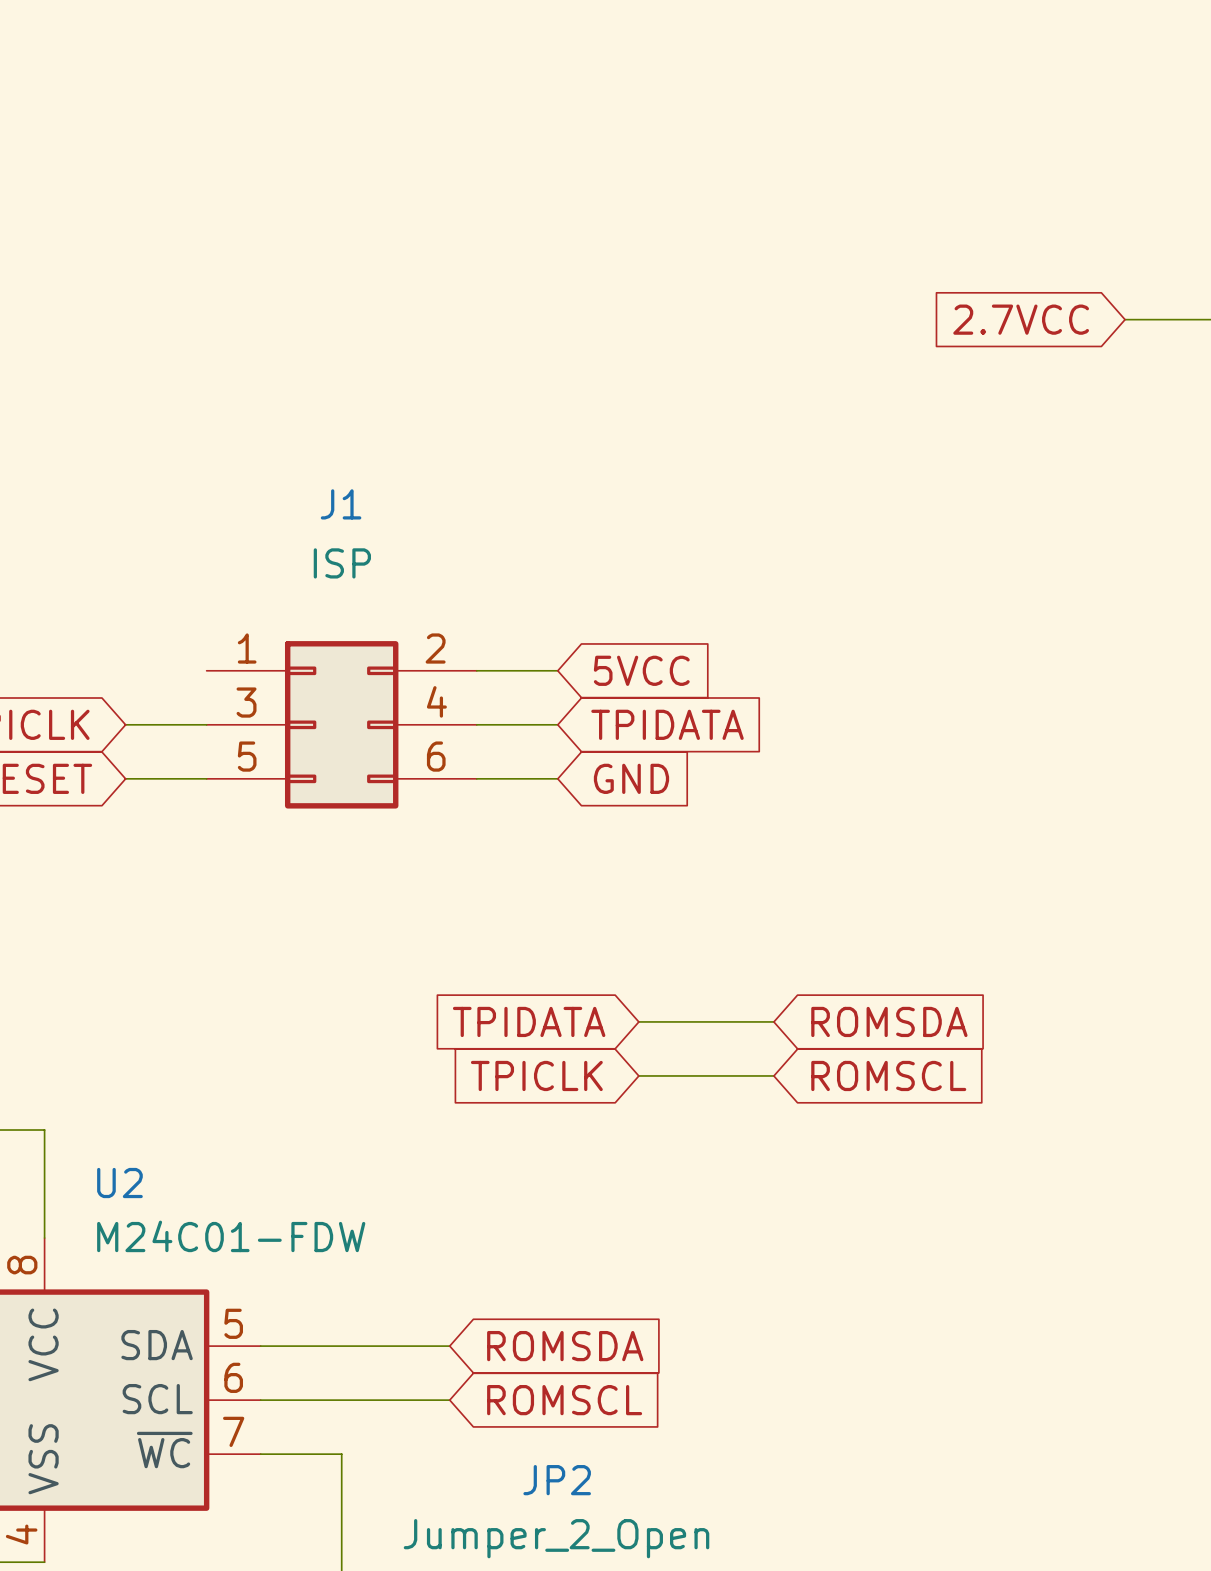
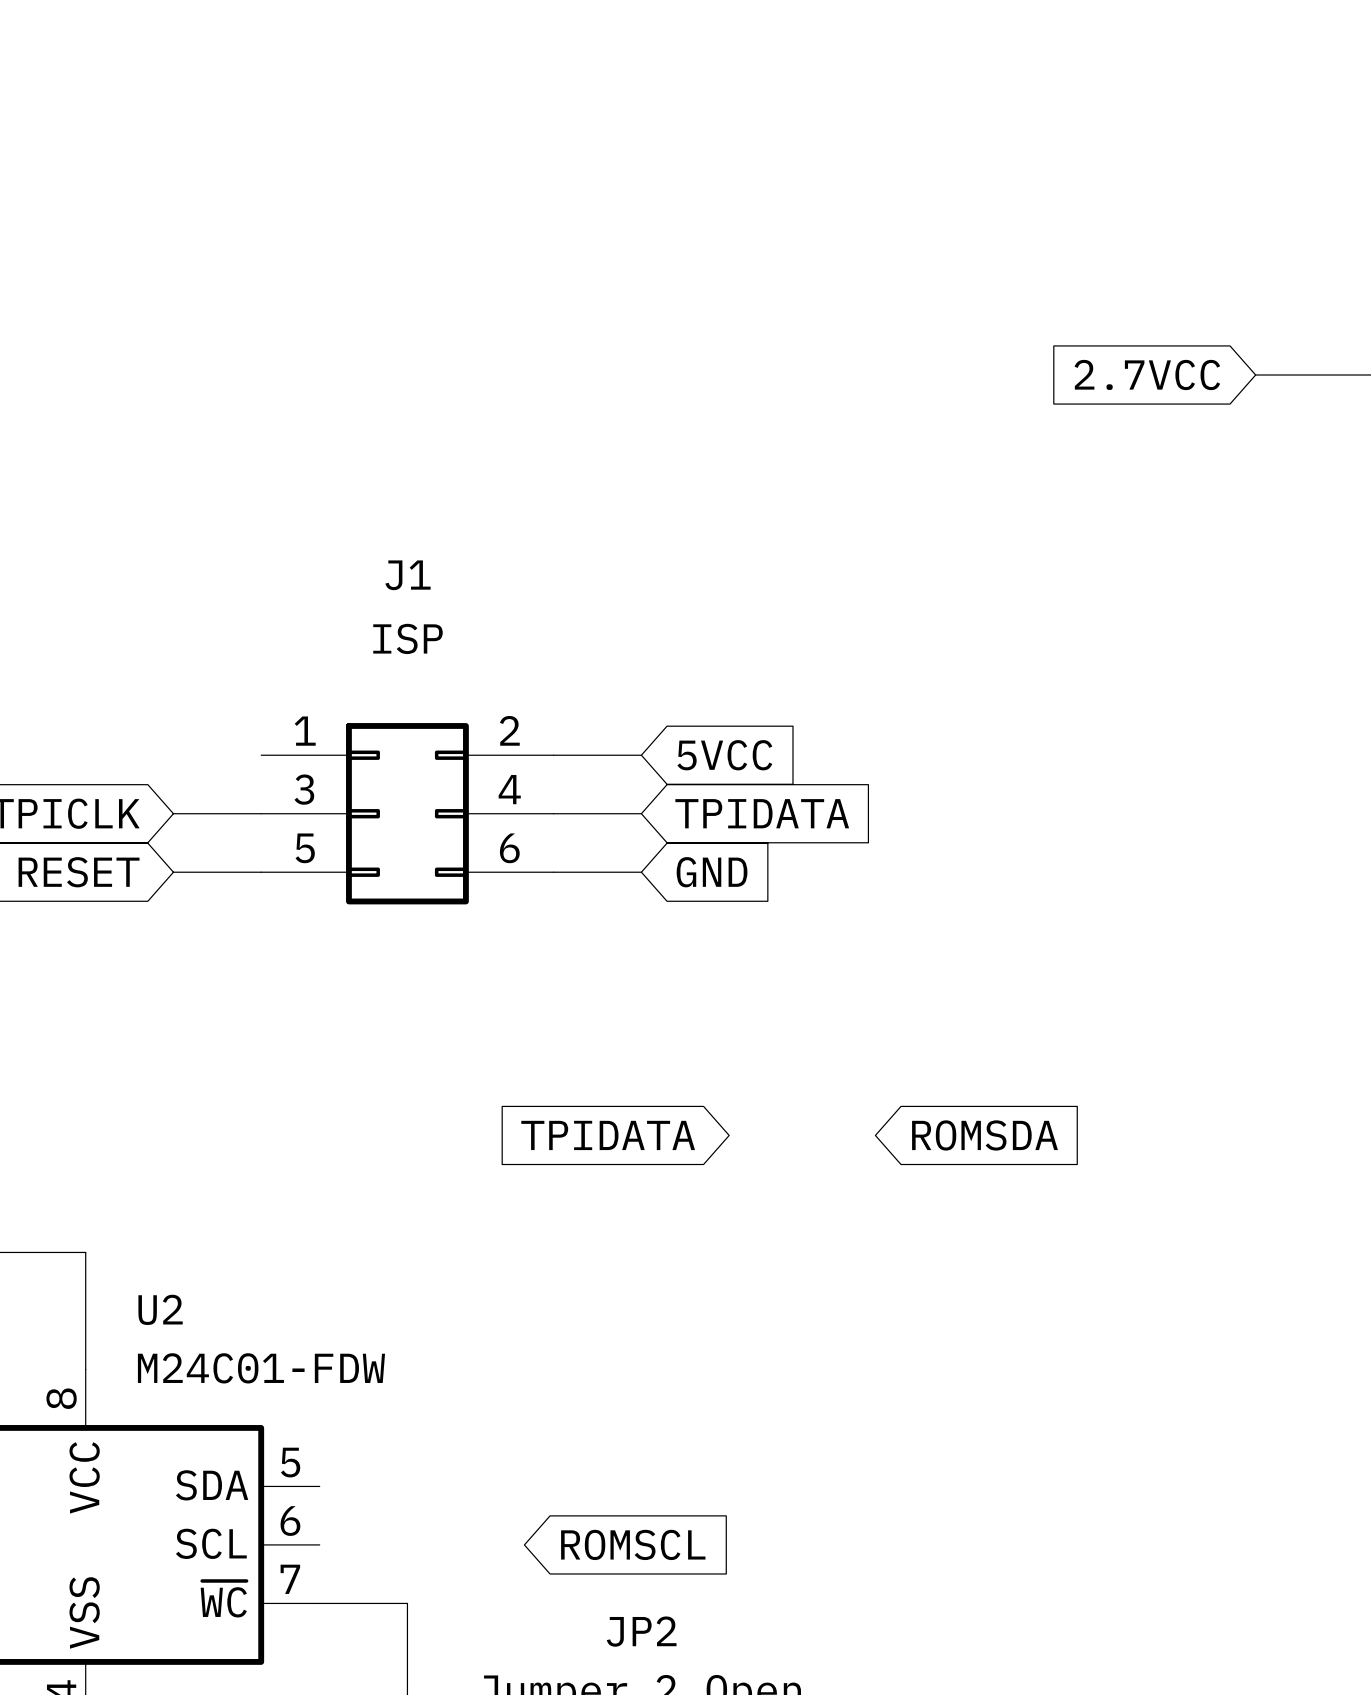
wire: (638, 1021) (773, 1021) -> none
global label: TPICLK (536, 1075) -> none
wire: (638, 1075) (773, 1075) -> none
global label: ROMSCL (888, 1075) -> none
wire: (260, 1346) (449, 1346) -> none
global label: ROMSDA (565, 1346) -> none
wire: (260, 1400) (449, 1400) -> none

